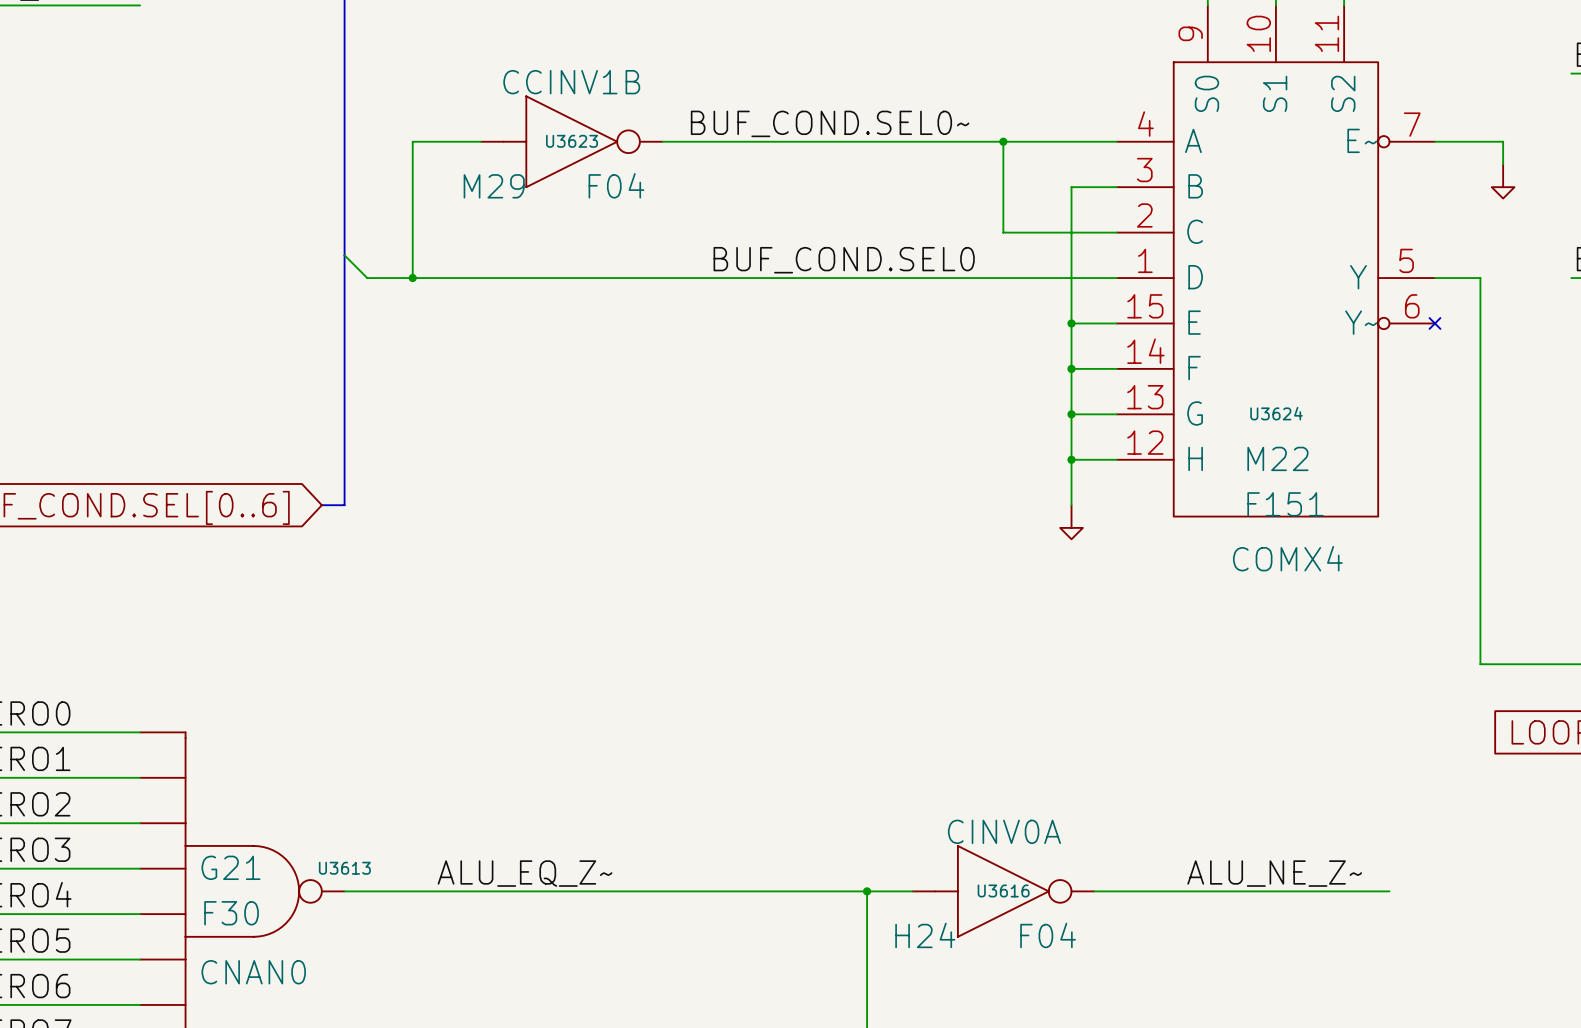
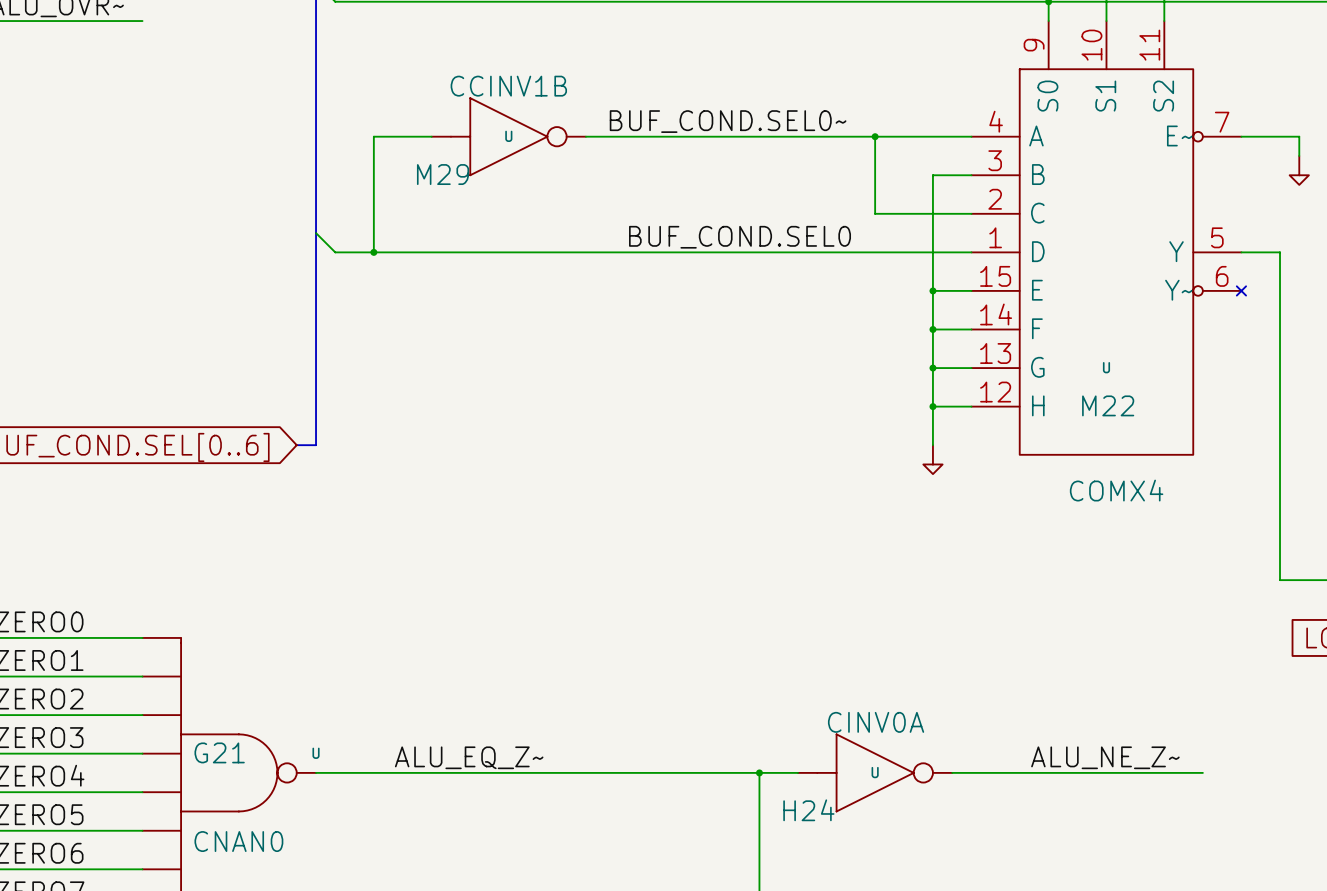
U3623 name: U3623 (572, 141) -> U (508, 136)
U3623 value: F04 (616, 185) -> none
U3624 name: U3624 (1276, 413) -> U (1106, 367)
U3624 value: F151 (1285, 504) -> none
U3613 name: U3613 (344, 868) -> U (316, 753)
U3616 name: U3616 (1003, 890) -> U (875, 772)
U3613 value: F30 (231, 913) -> none
U3616 value: F04 (1048, 935) -> none

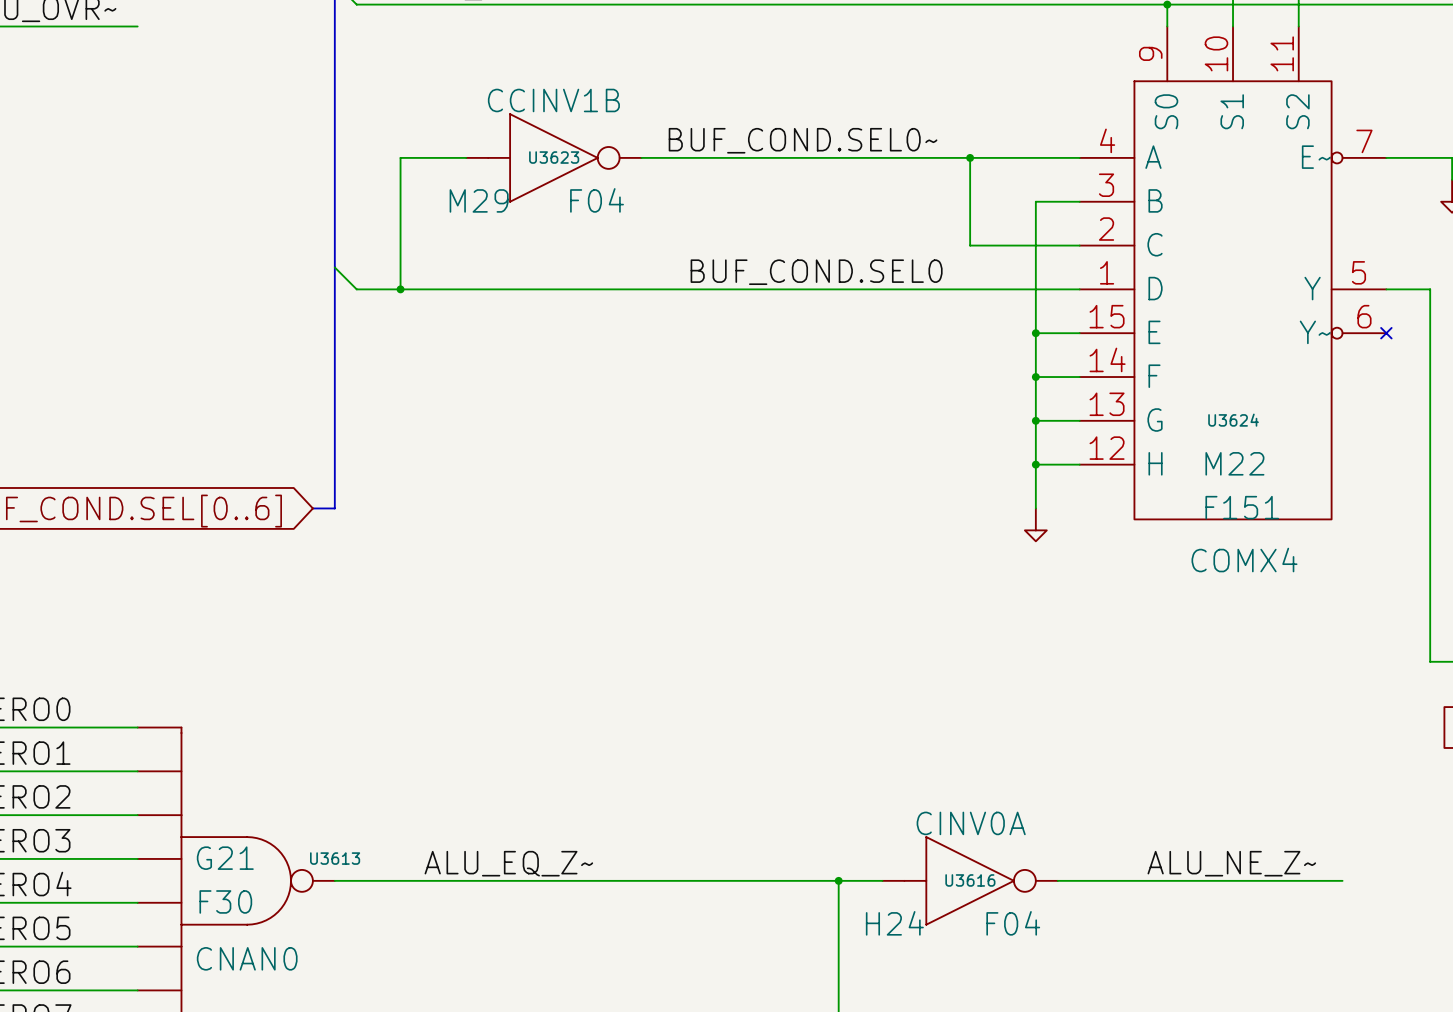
U name: U (508, 136) -> U3623 (554, 157)
U value: none -> F04 (597, 200)
U name: U (1106, 367) -> U3624 (1233, 420)
U value: none -> F151 (1242, 507)
U name: U (316, 753) -> U3613 (335, 858)
U name: U (875, 772) -> U3616 (970, 880)
U value: none -> F30 (225, 901)
U value: none -> F04 (1013, 923)

